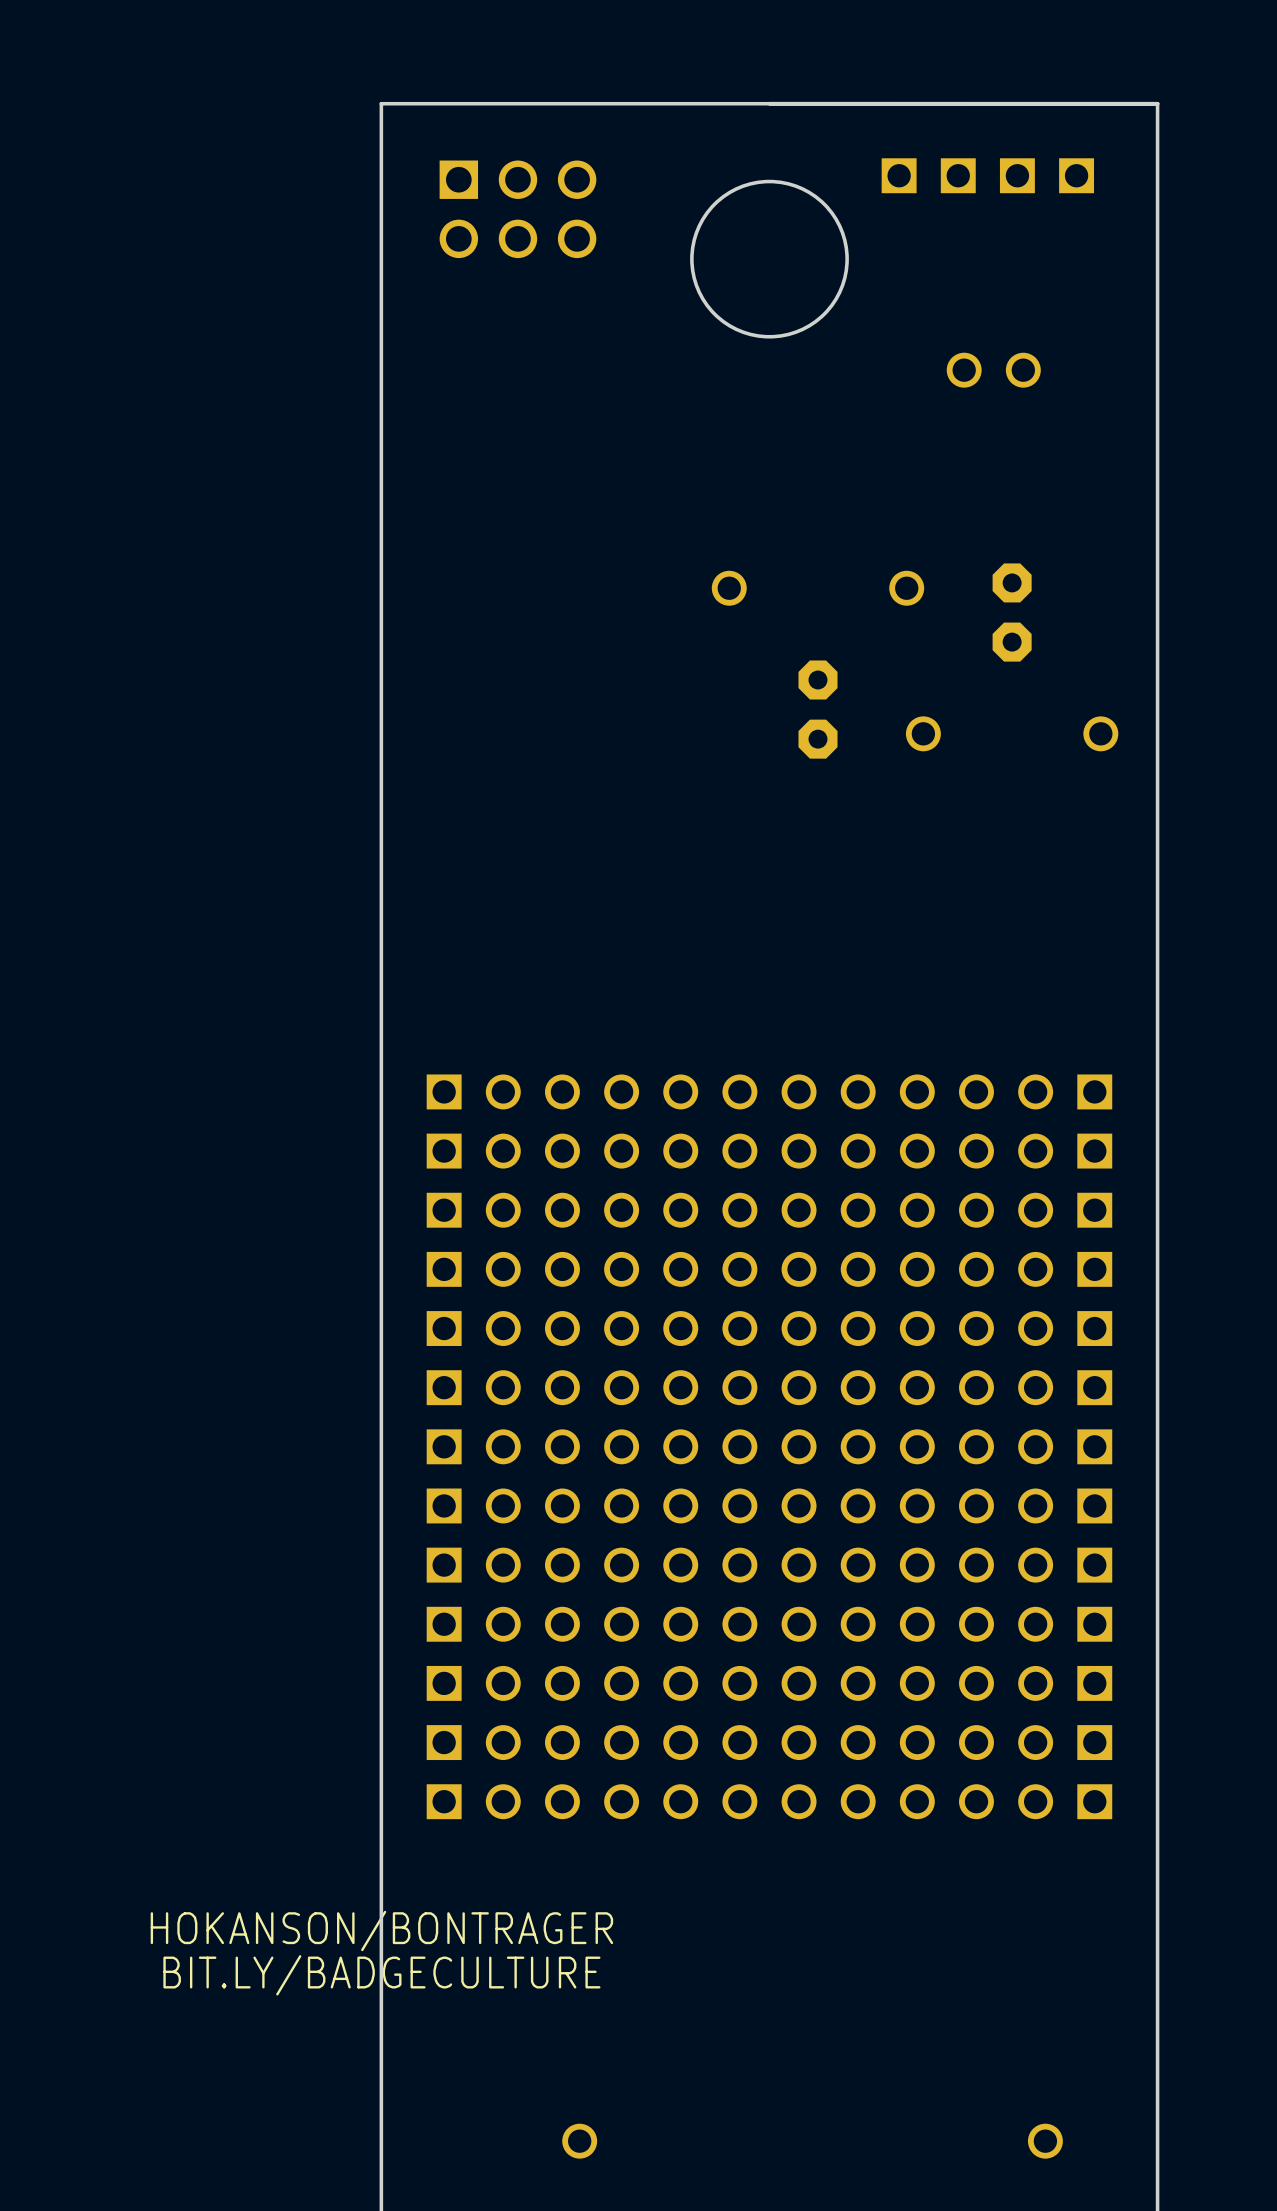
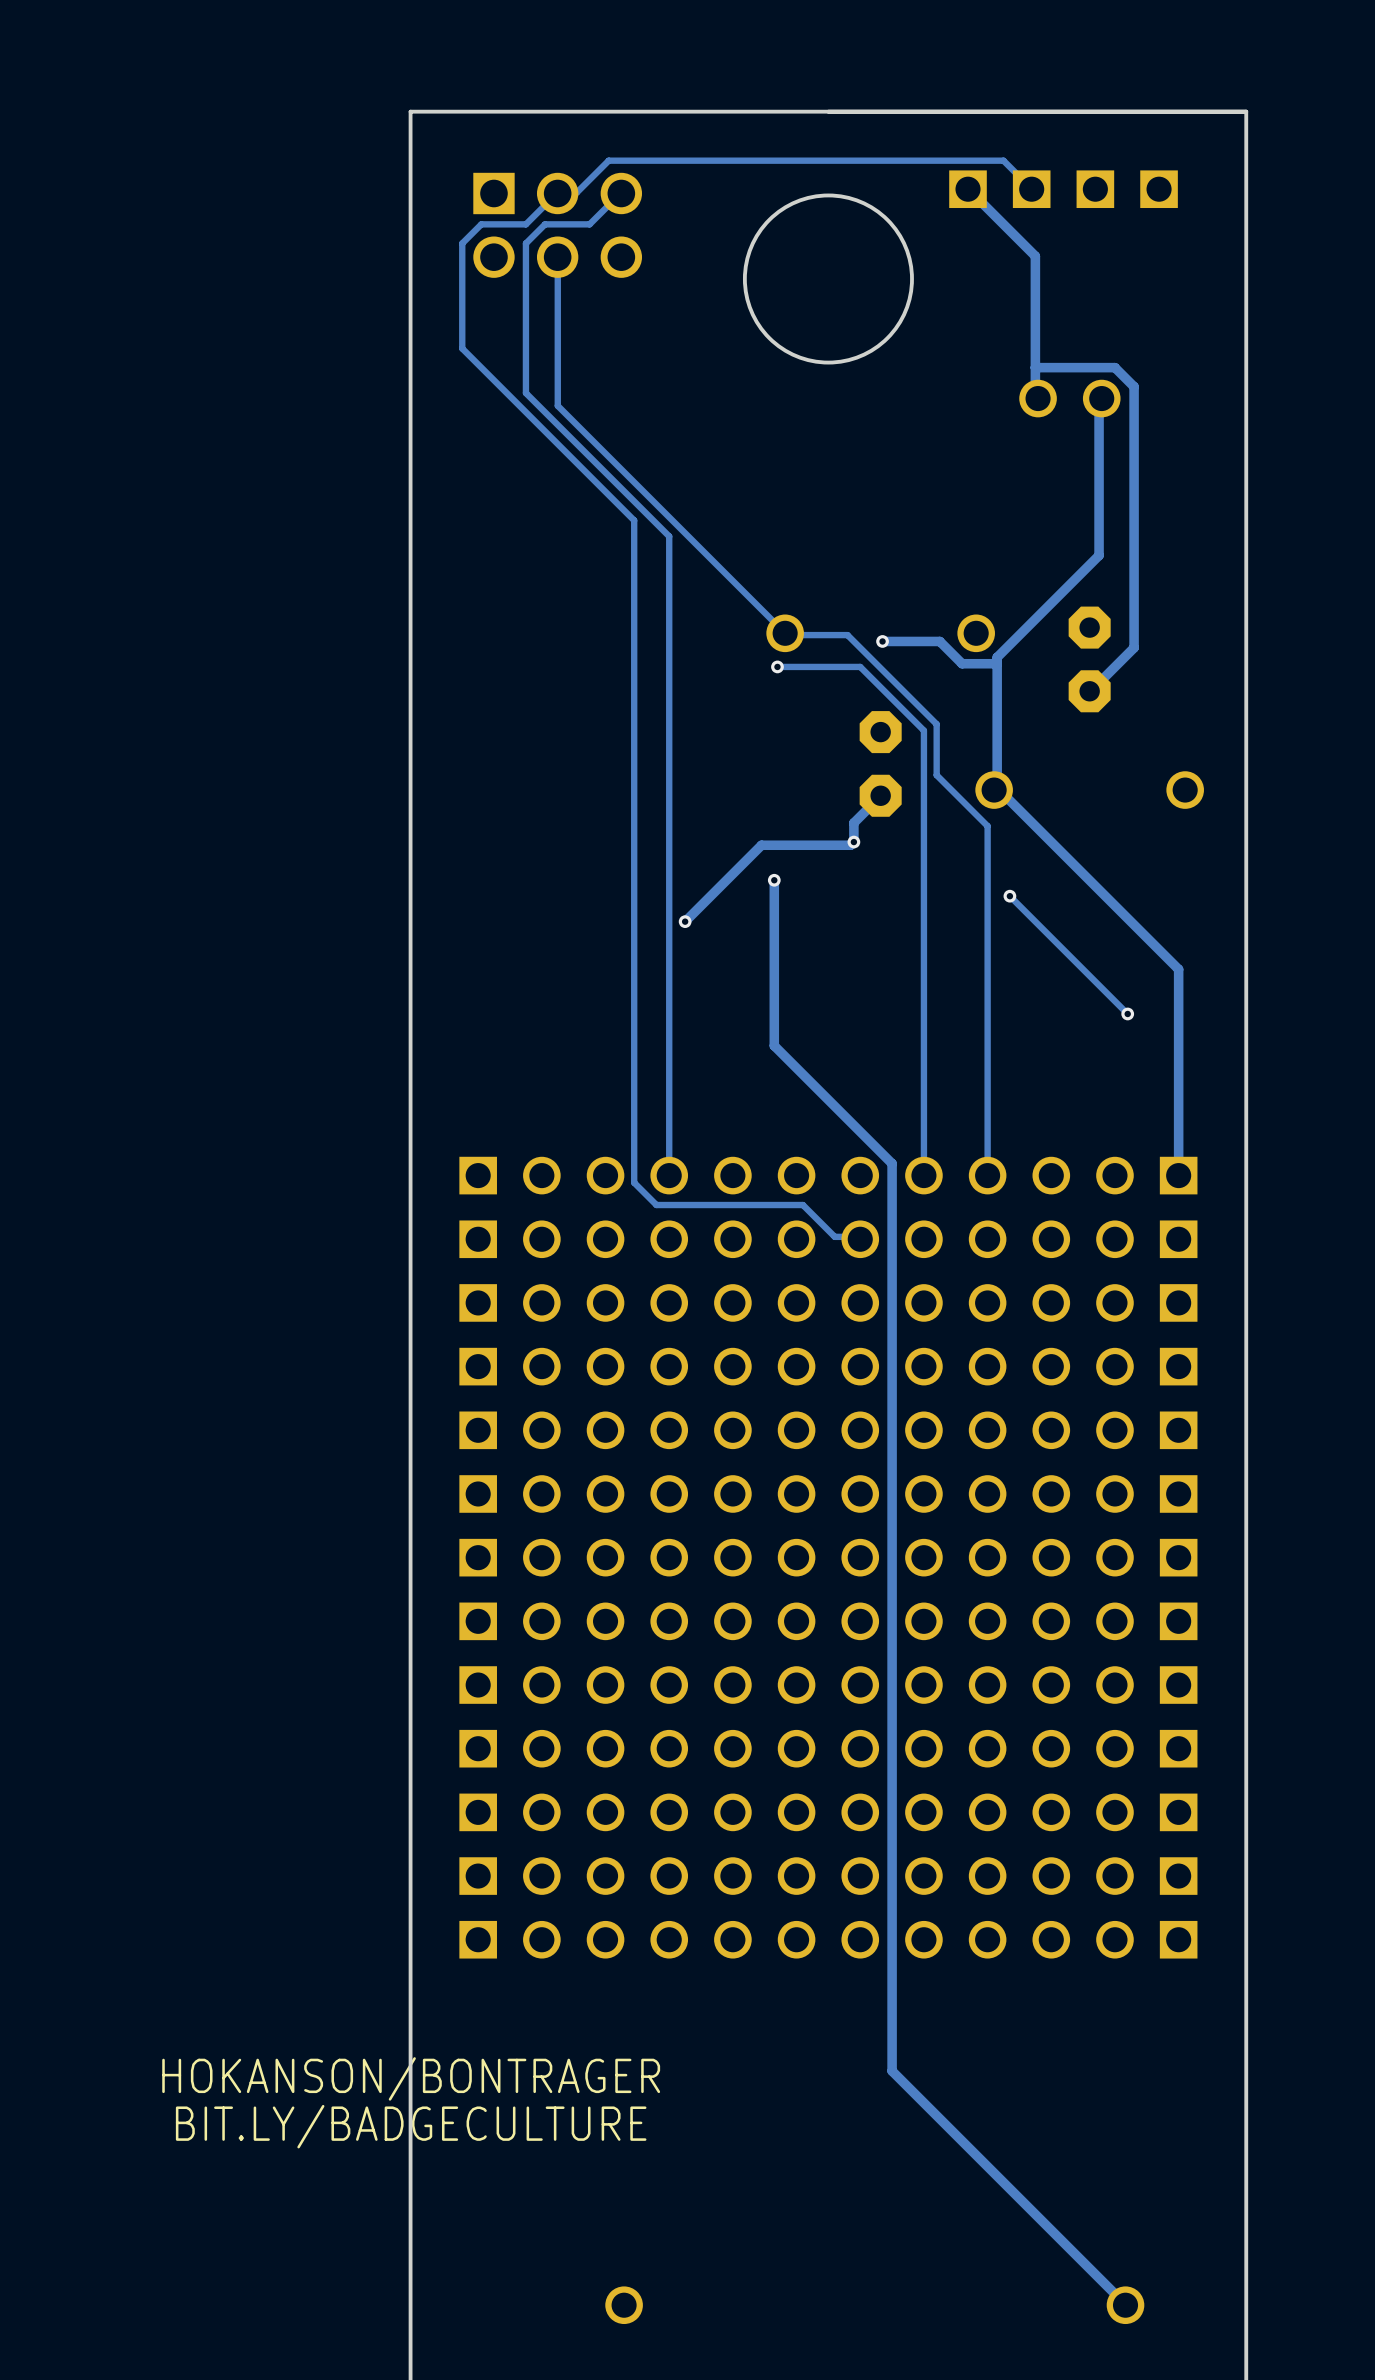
track: none -> (968, 189) (1035, 256) (1035, 396) (1038, 398)
track: none -> (1031, 189) (1003, 160) (608, 160) (576, 192) (557, 192) (525, 224) (481, 224) (462, 243) (462, 348) (634, 520) (634, 1182) (656, 1205) (802, 1205) (834, 1236) (860, 1236) (860, 1239)
track: none -> (621, 193) (589, 224) (545, 224) (525, 243) (525, 393) (669, 536) (669, 1175)
track: none -> (557, 257) (557, 405) (787, 635) (847, 635) (936, 724) (936, 775) (987, 826) (987, 1175)
track: none -> (1035, 367) (1114, 367) (1134, 386) (1134, 647) (1089, 691)
track: none -> (1101, 398) (1099, 399) (1099, 555) (997, 657) (997, 787) (994, 790) (1000, 791) (1178, 969) (1178, 1175)
track: none -> (882, 641) (939, 641) (962, 663) (997, 663)
via: none -> (882, 641)
track: none -> (777, 666) (860, 666) (923, 730) (923, 1175)
via: none -> (777, 666)
track: none -> (880, 795) (853, 822) (853, 842) (850, 845) (761, 845) (685, 921)
via: none -> (853, 842)
track: none -> (774, 880) (774, 1045) (892, 1163) (892, 2071) (1125, 2305)
via: none -> (774, 880)
track: none -> (1009, 896) (1127, 1013)
via: none -> (1009, 896)
via: none -> (685, 921)
via: none -> (1127, 1013)

